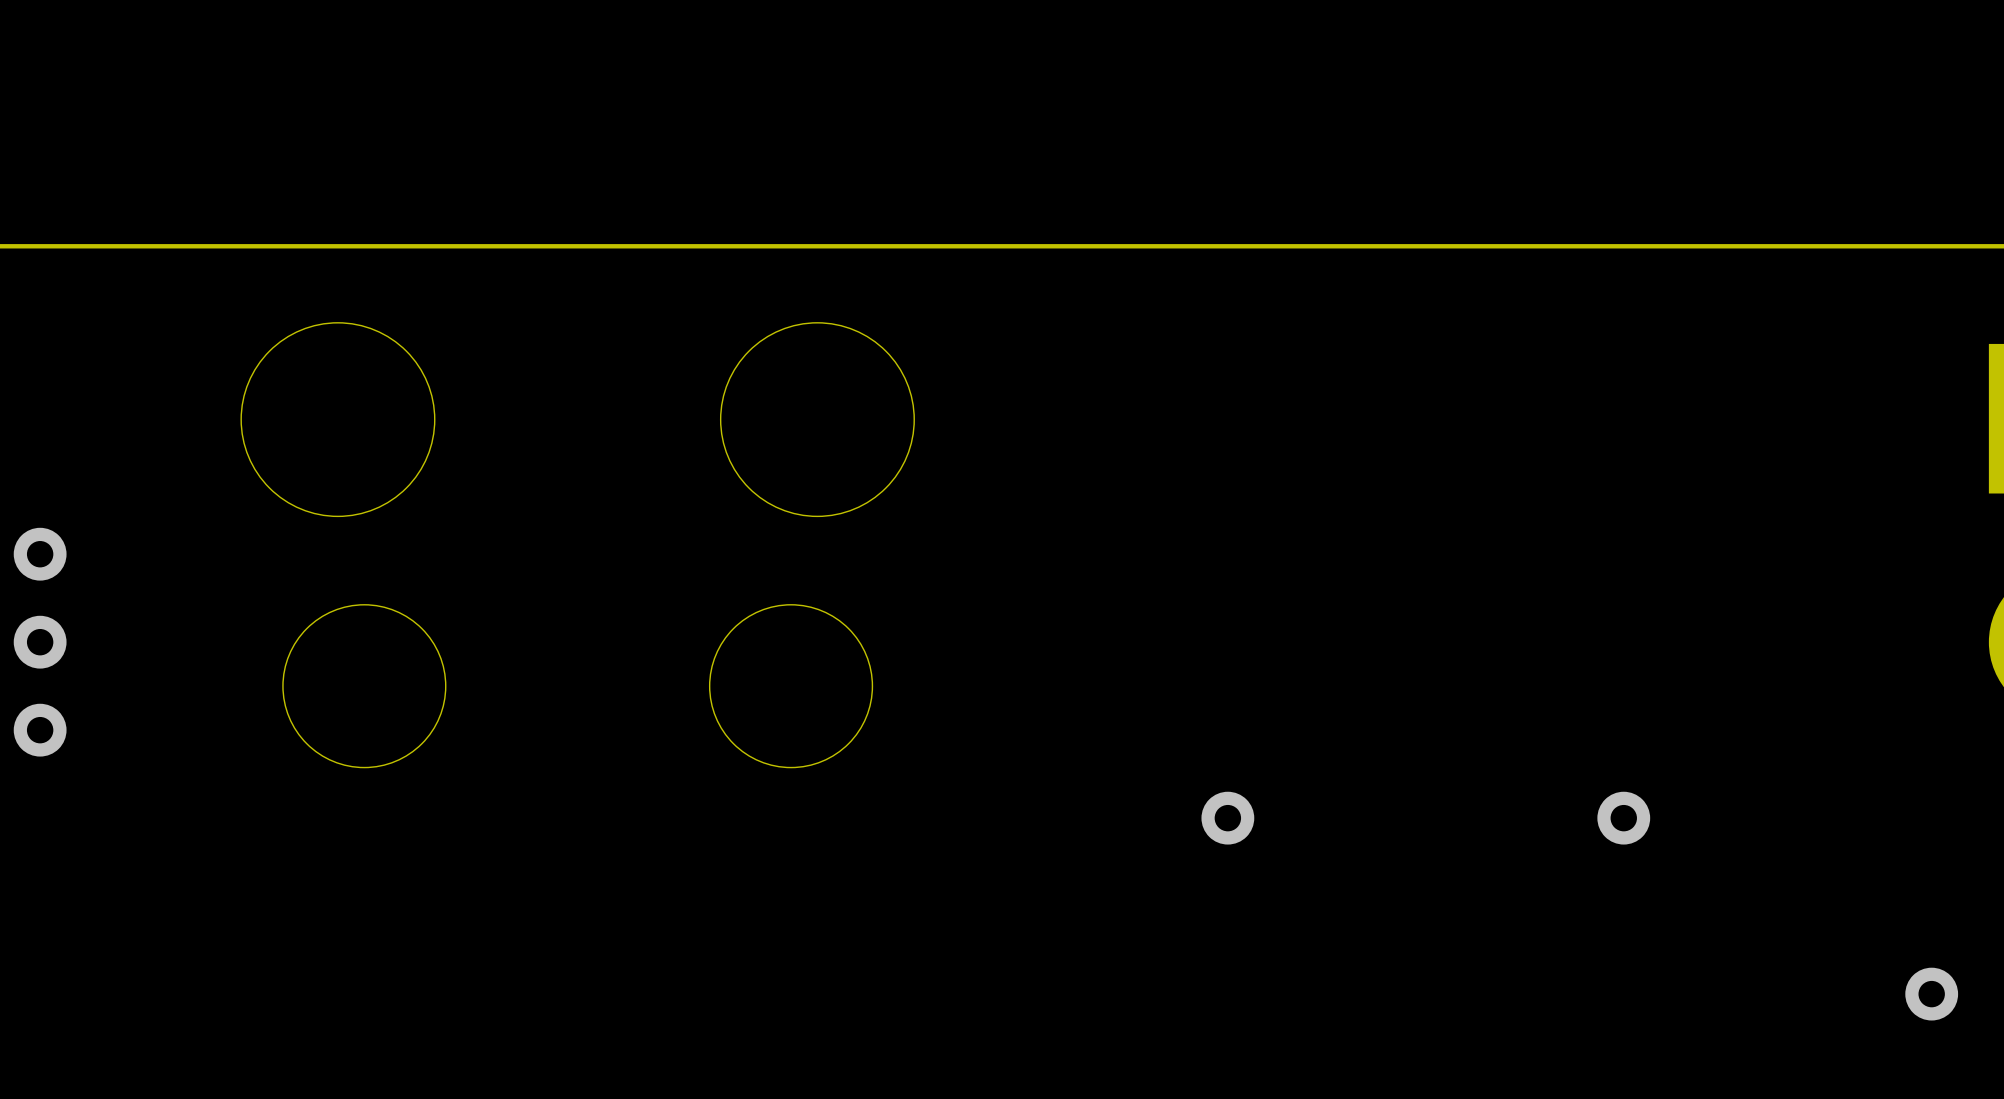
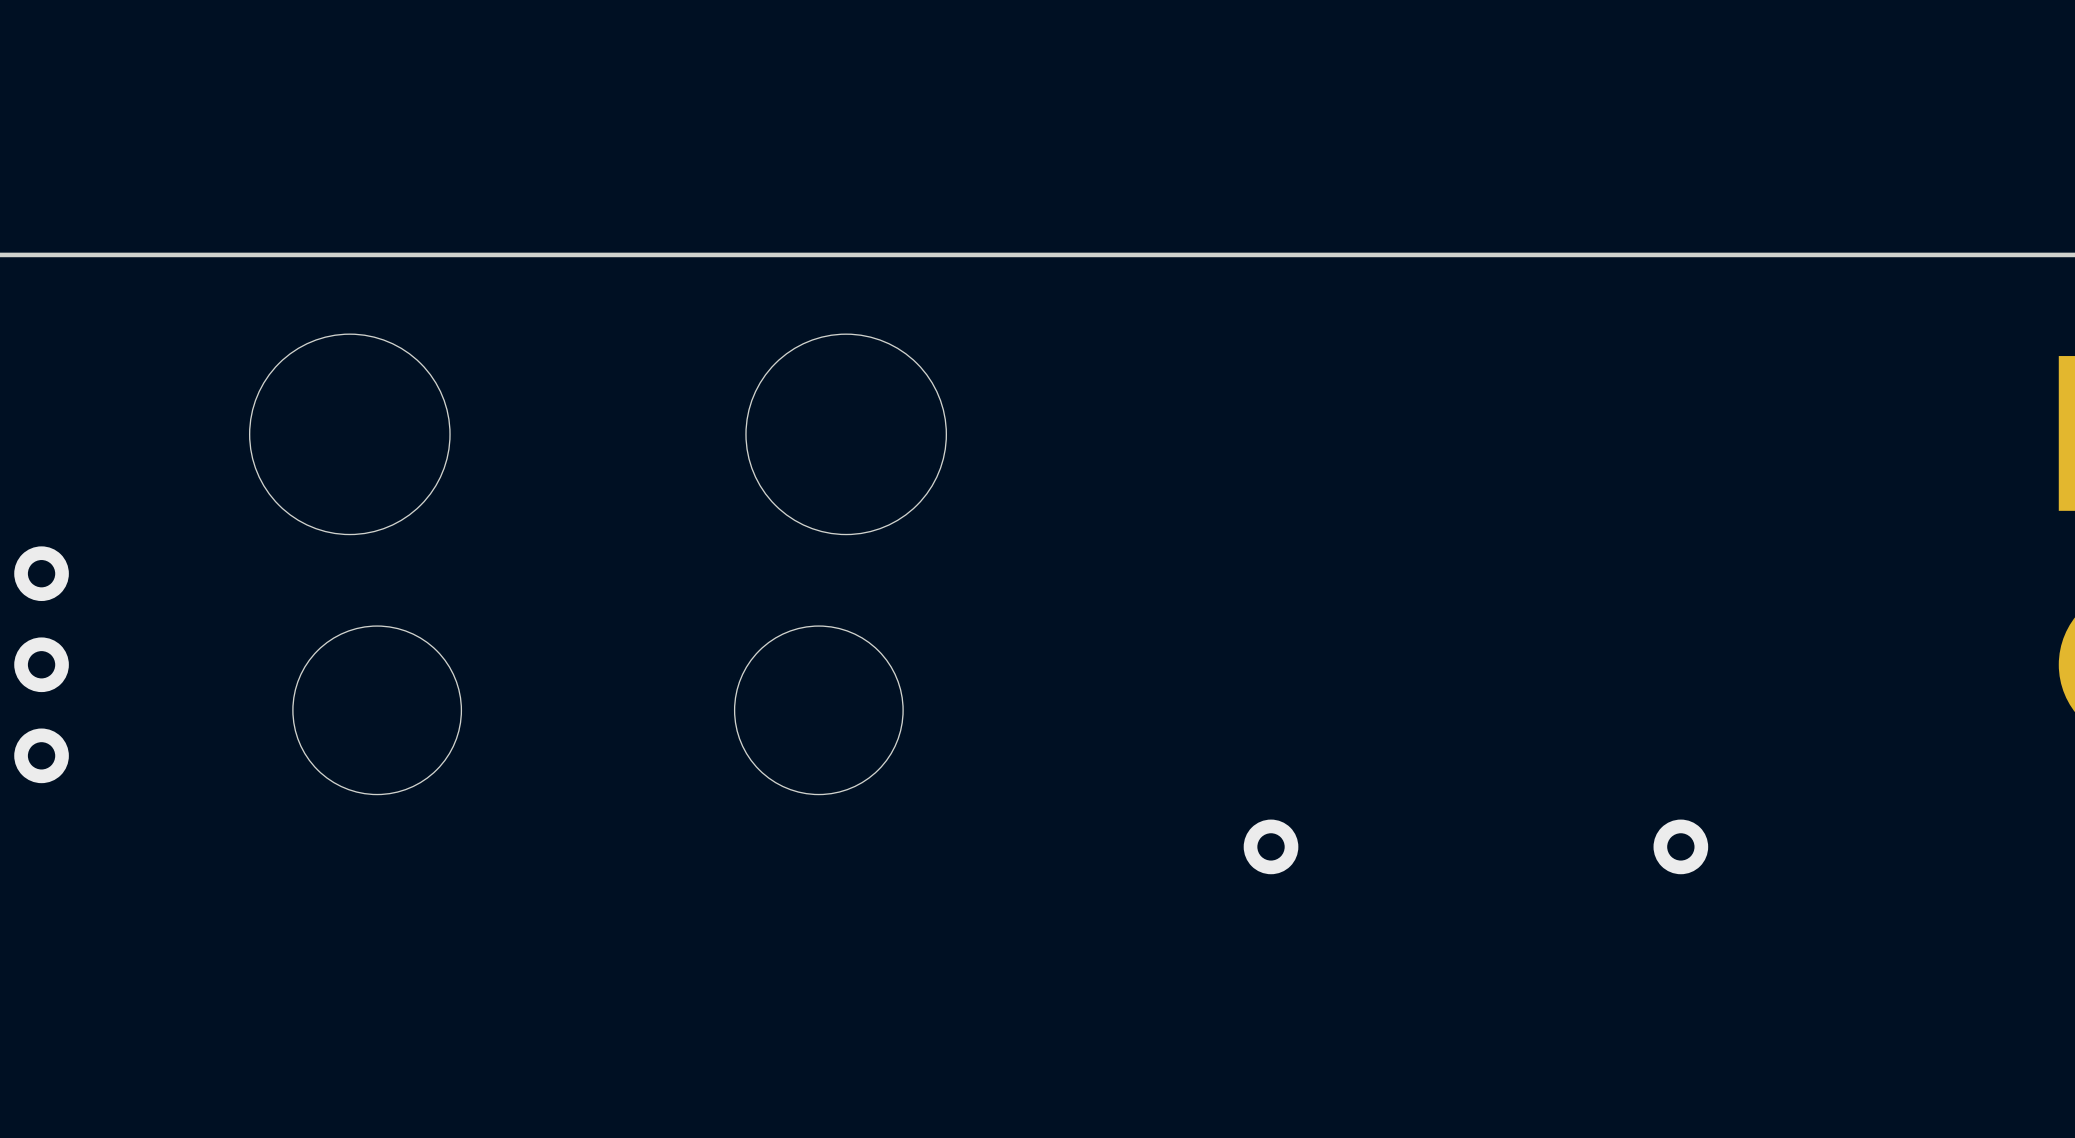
via: (1931, 994) -> none

